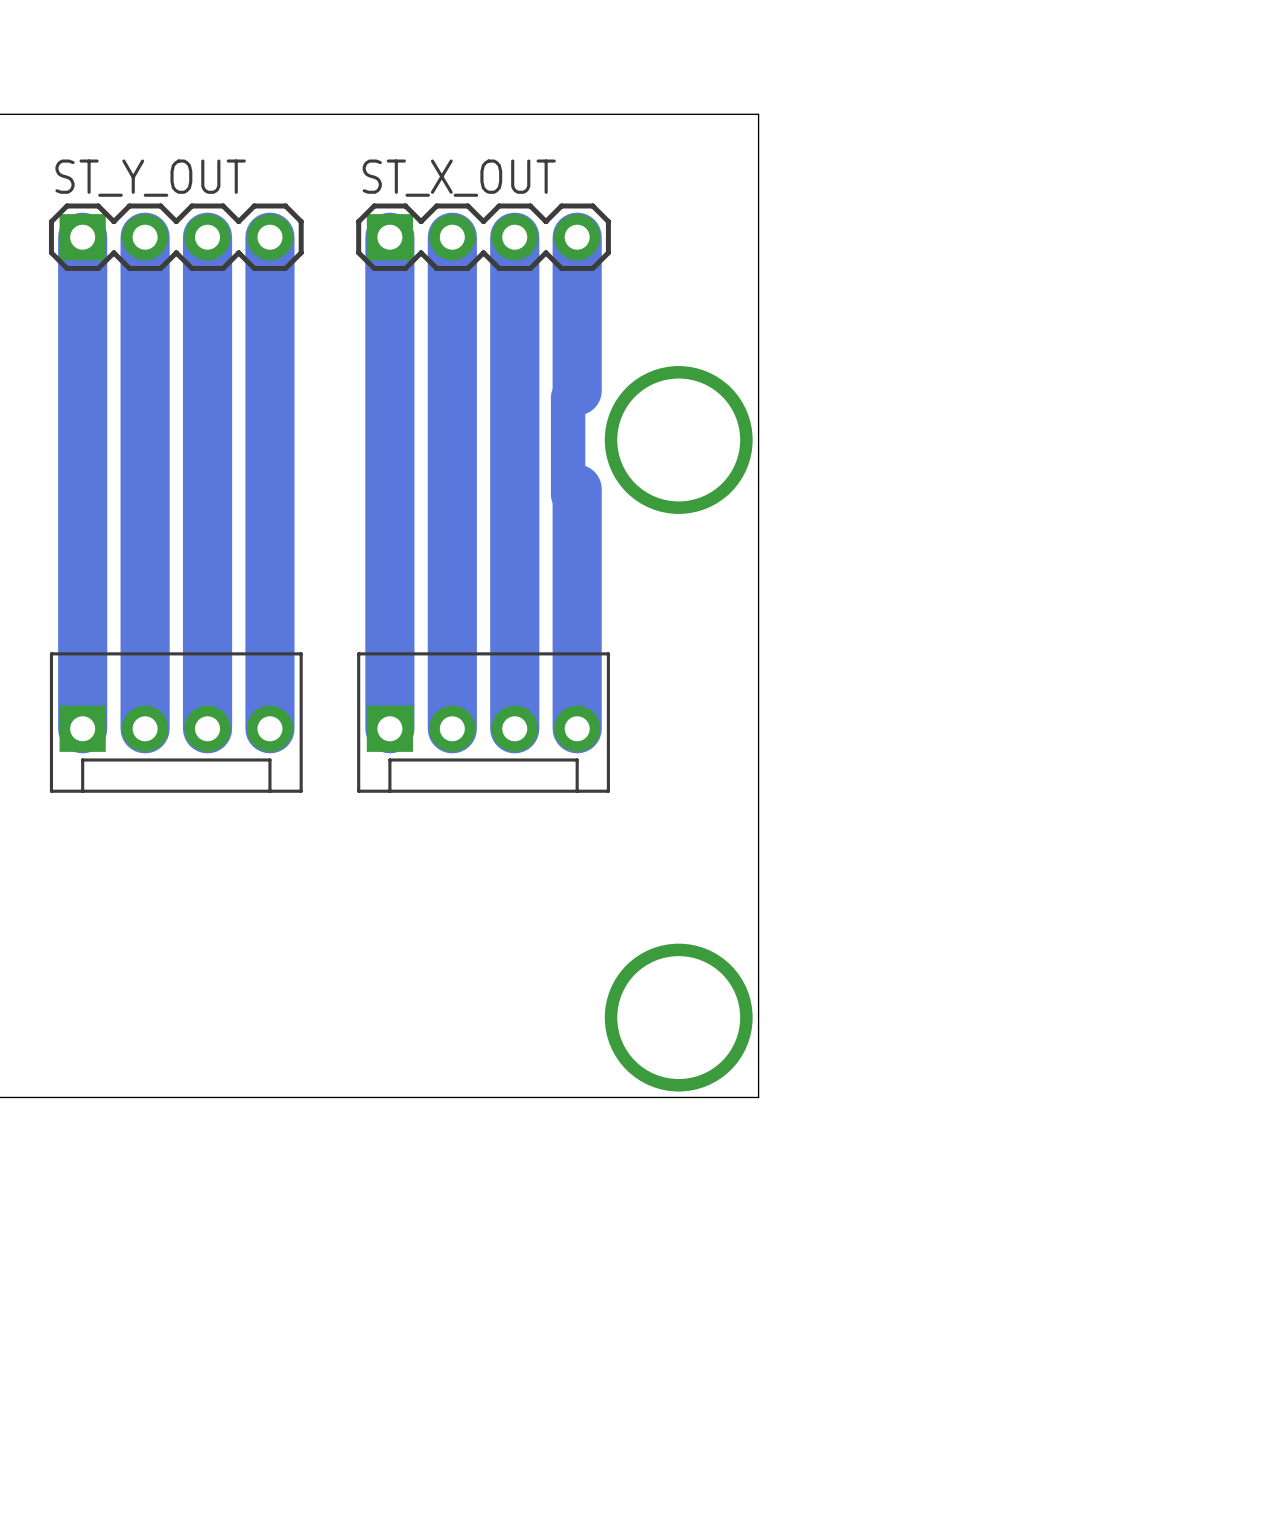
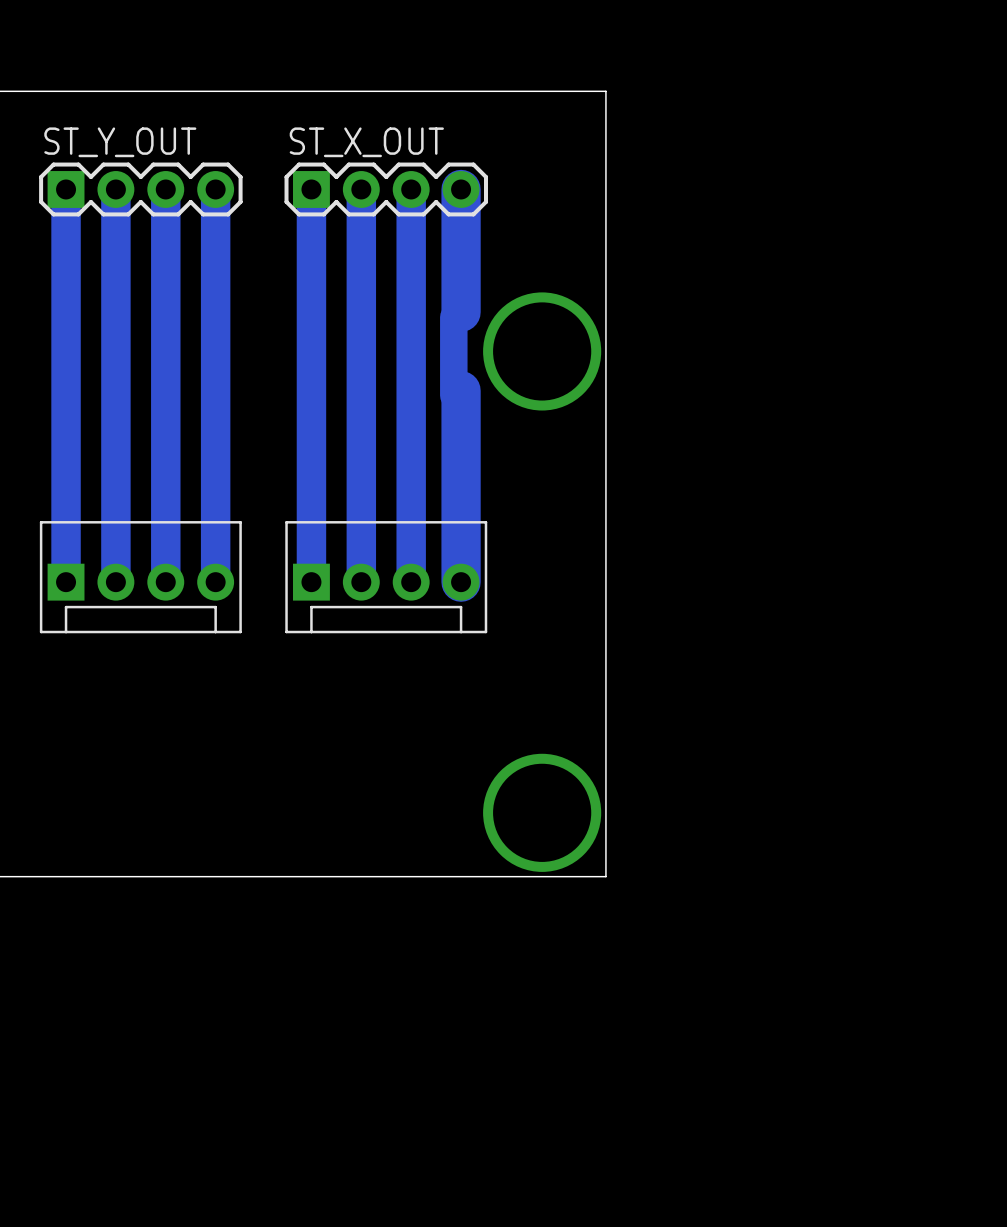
bottom track width: thick (82, 237) (82, 728) -> thin (66, 189) (66, 582)
bottom track width: thick (145, 237) (145, 728) -> thin (115, 189) (115, 582)
bottom track width: thick (207, 237) (207, 728) -> thin (165, 189) (165, 582)
bottom track width: thick (269, 237) (269, 728) -> thin (215, 189) (215, 582)
bottom track width: thick (389, 237) (389, 728) -> thin (311, 189) (311, 582)
bottom track width: thick (452, 237) (452, 728) -> thin (361, 189) (361, 582)
bottom track width: thick (514, 237) (514, 728) -> thin (411, 189) (411, 582)

